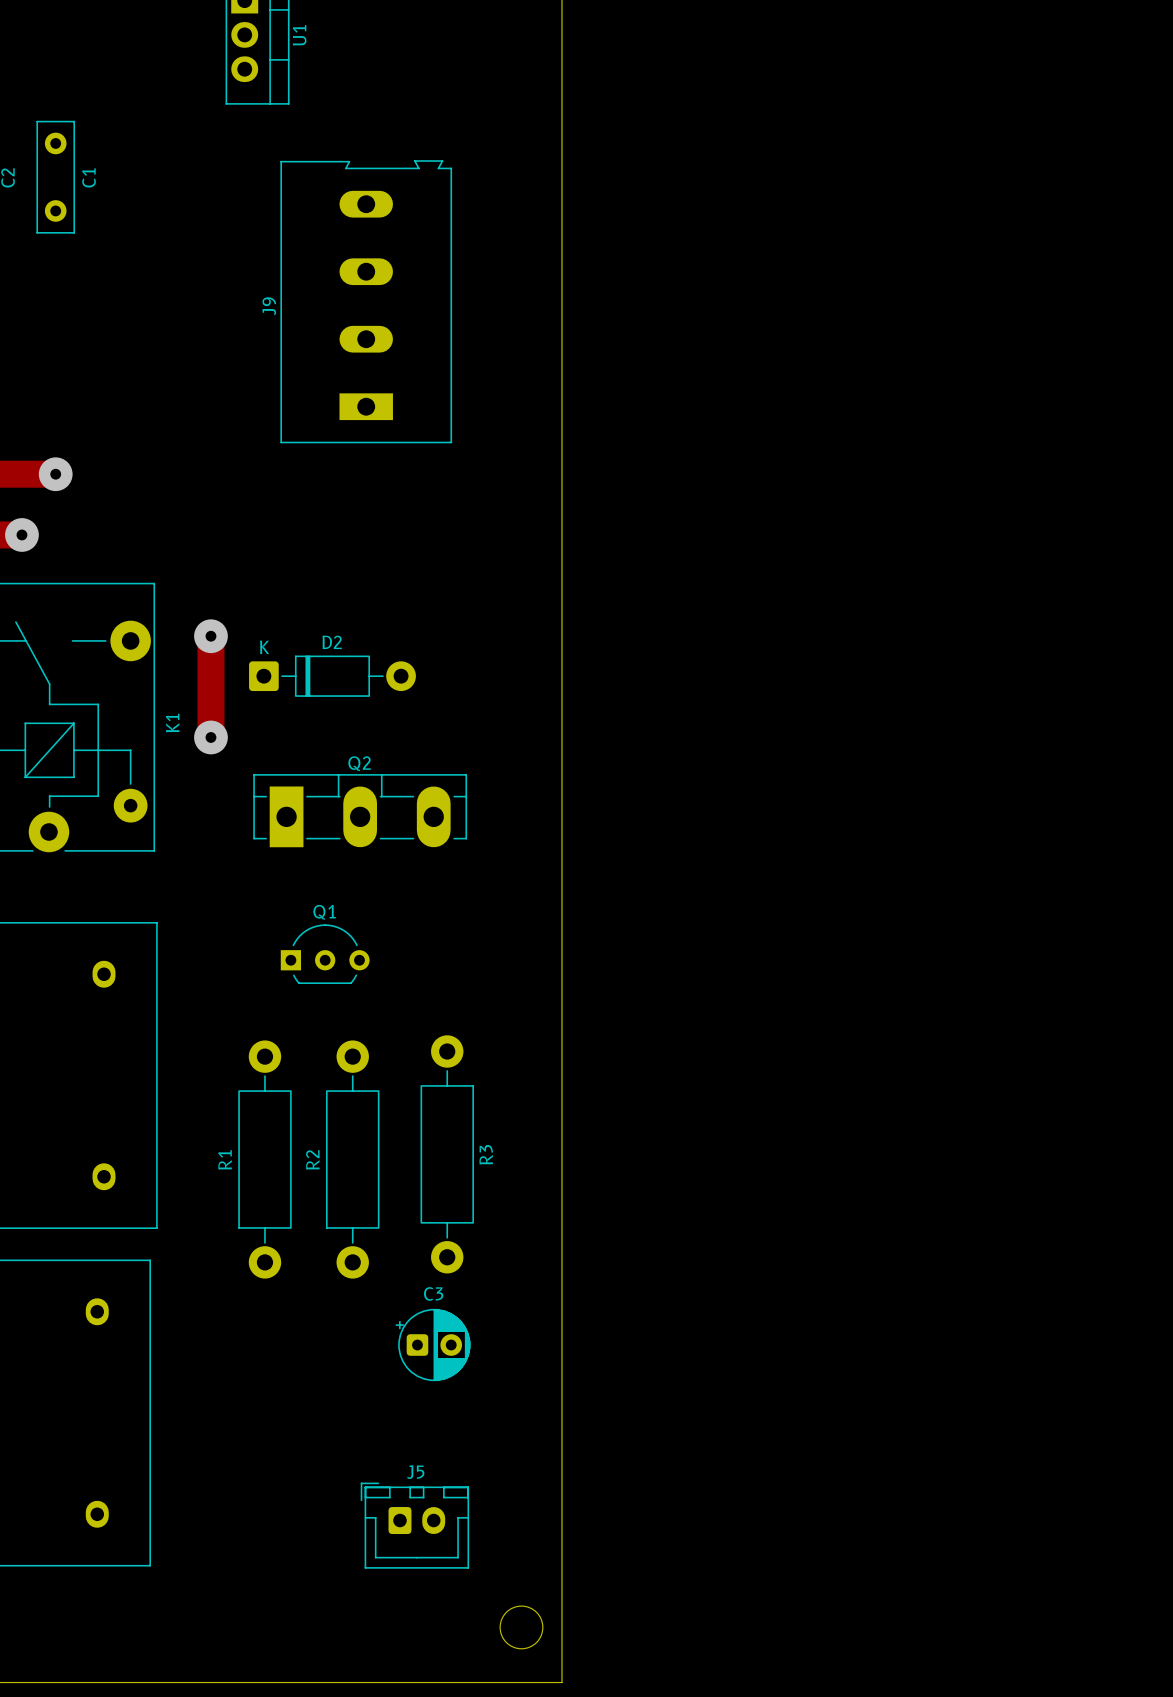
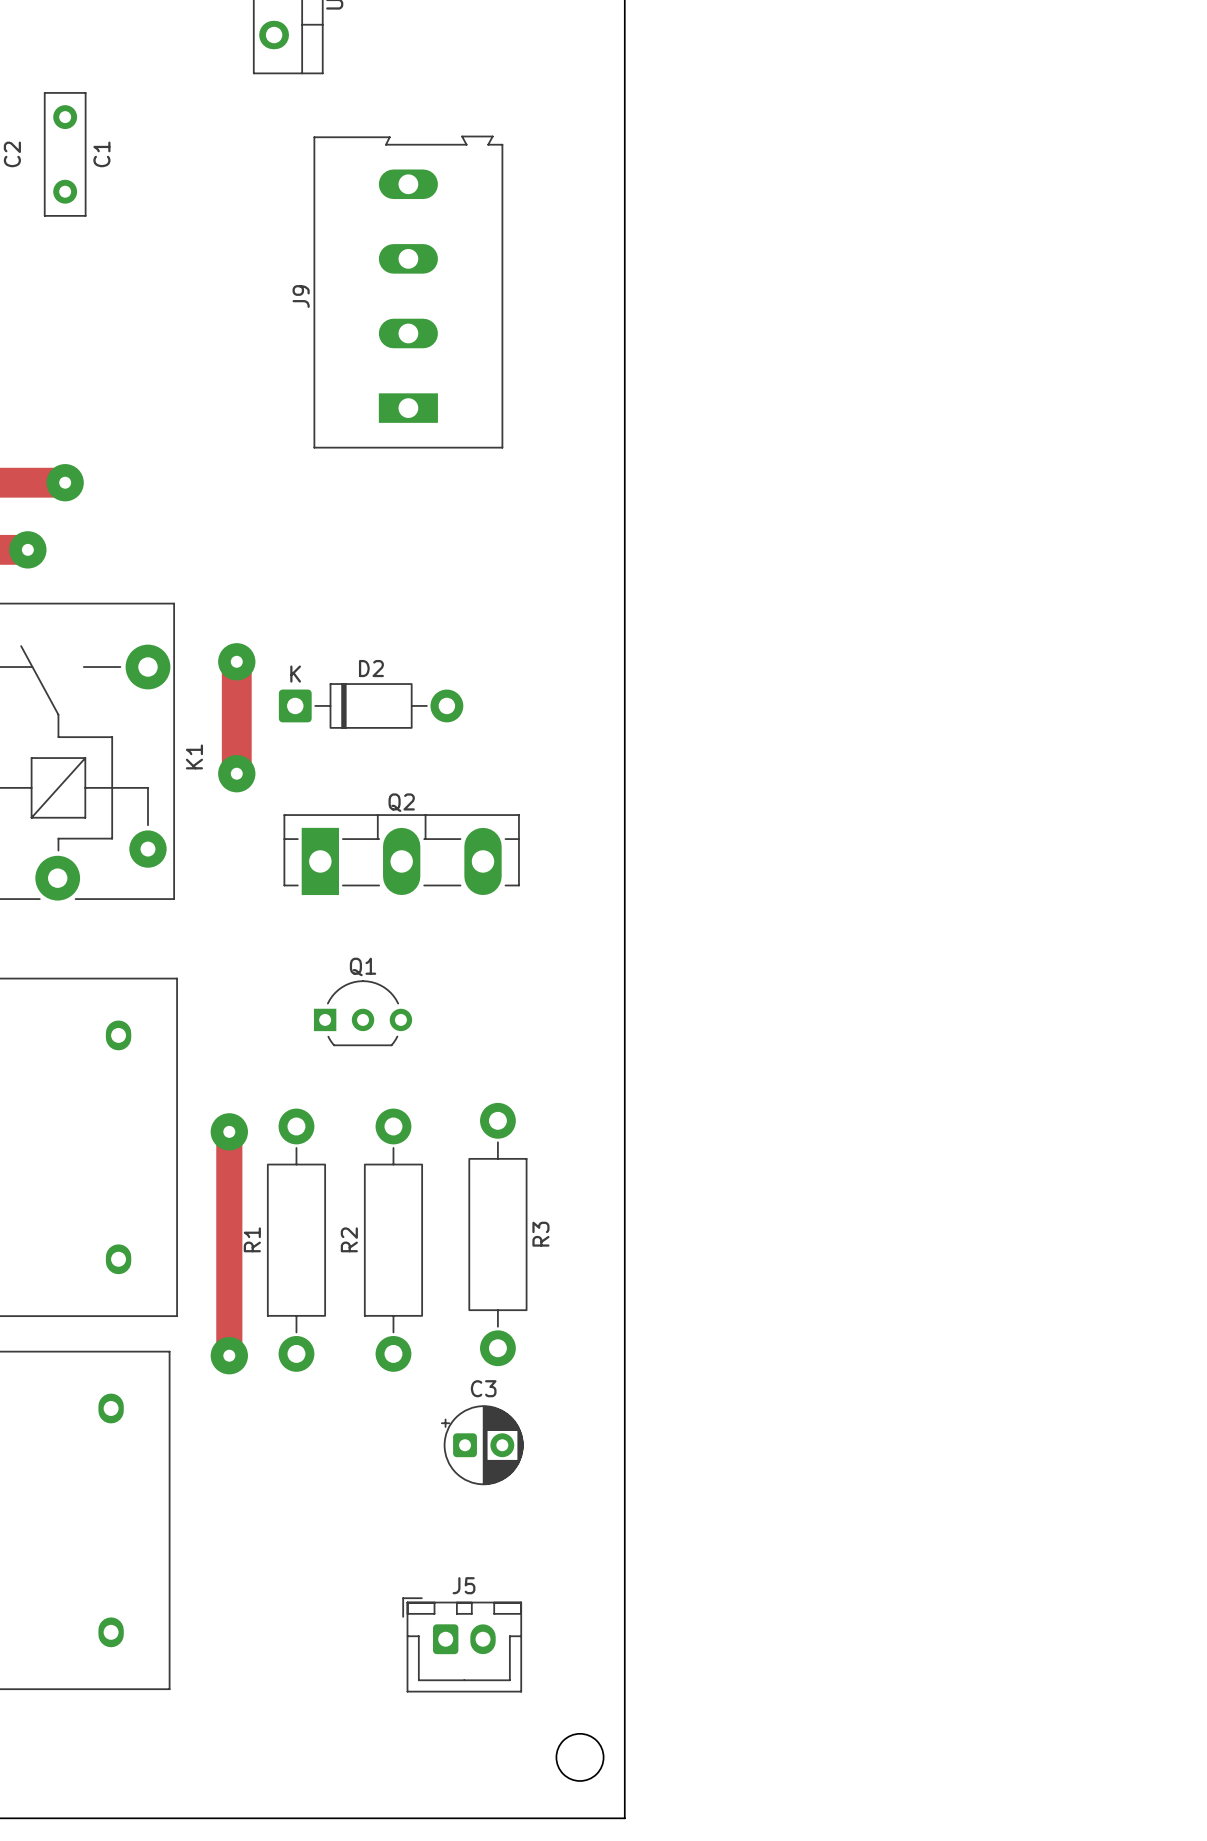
track: none -> (229, 1131) (229, 1355)
via: none -> (229, 1131)
via: none -> (229, 1355)

